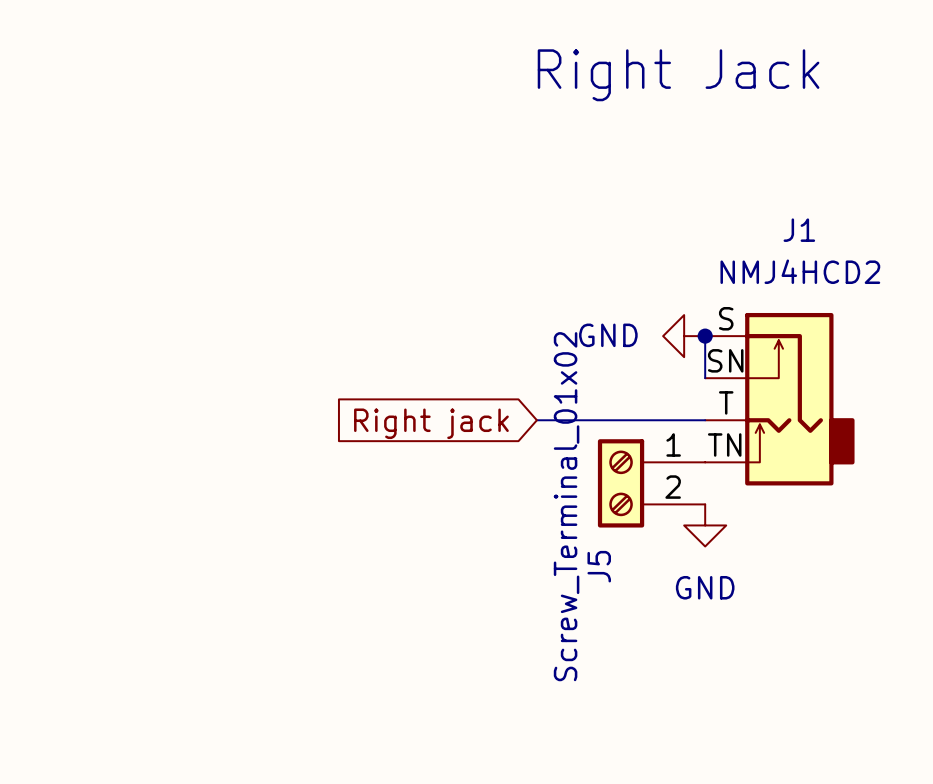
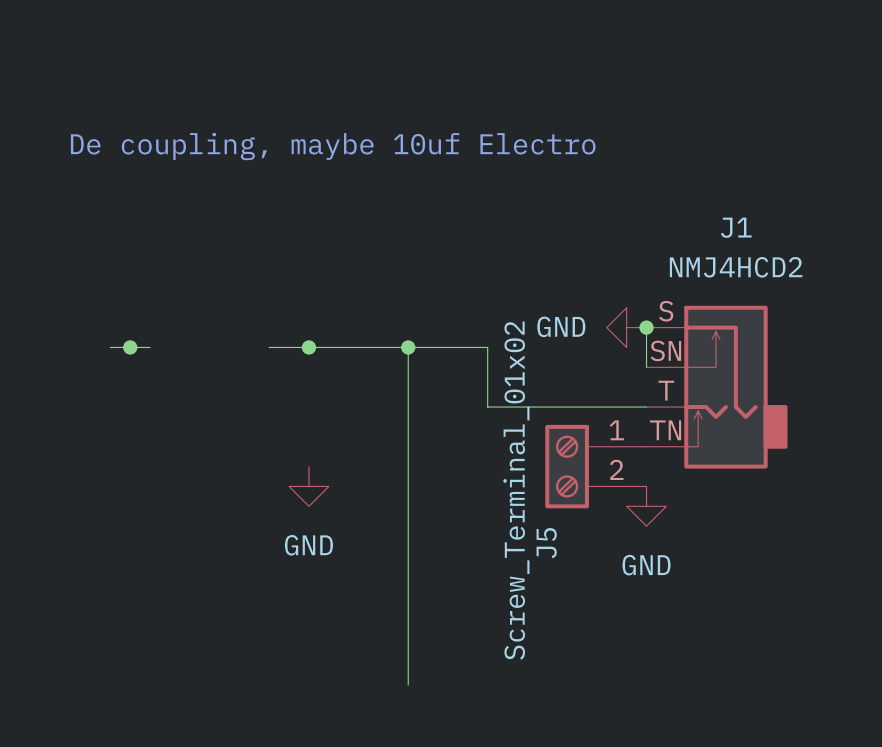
text: Right Jack (678, 75) -> none
text: none -> De coupling, maybe 10uf Electro (333, 146)
wire: none -> (110, 347) (150, 347)
junction: none -> (130, 347)
wire: none -> (269, 347) (487, 347) (487, 407)
junction: none -> (308, 347)
wire: none -> (408, 347) (408, 685)
junction: none -> (408, 347)
global label: Right jack (431, 423) -> none
power symbol: none -> GND (308, 486)

